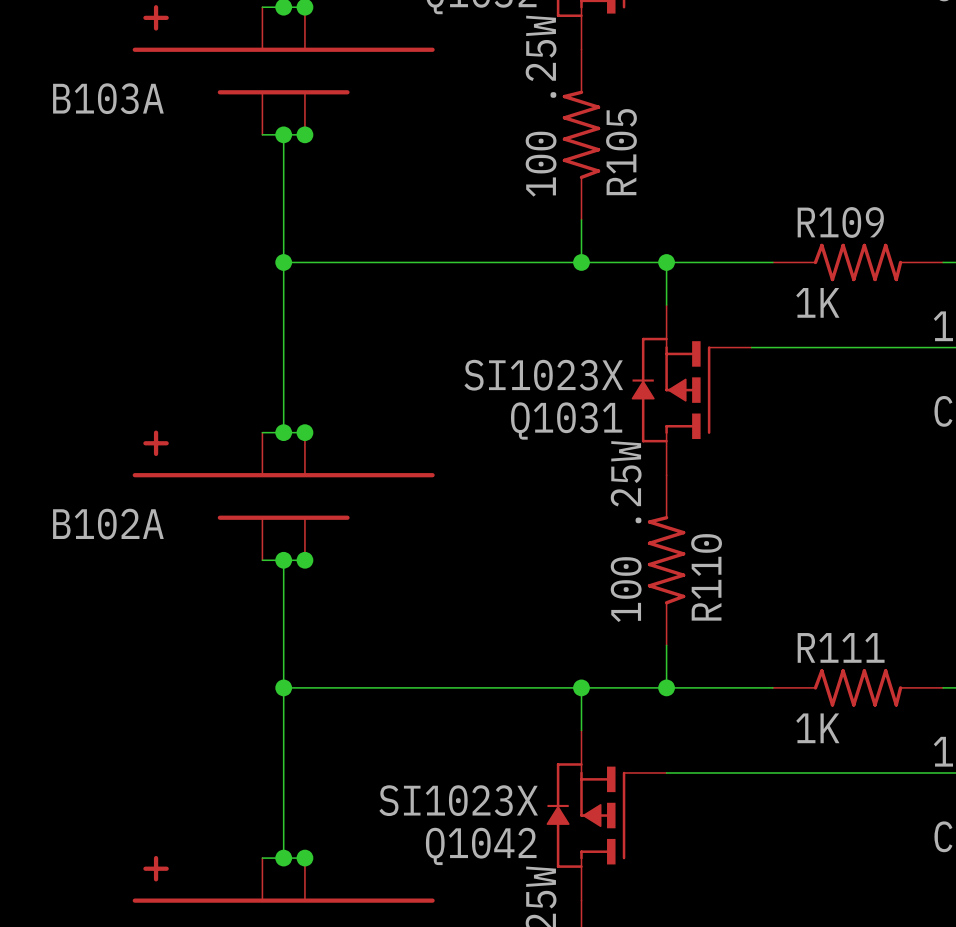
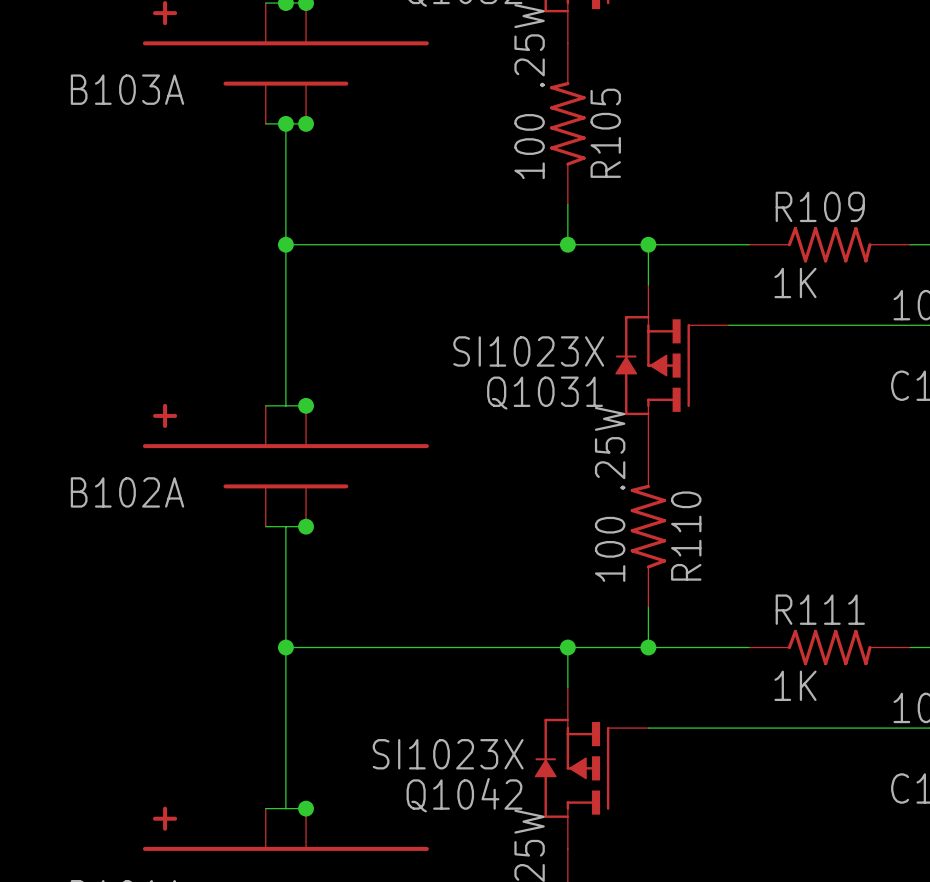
junction: (283, 432) -> none
junction: (283, 560) -> none
junction: (283, 858) -> none

